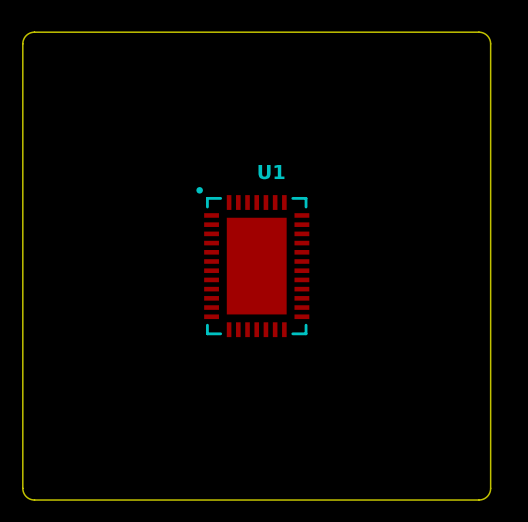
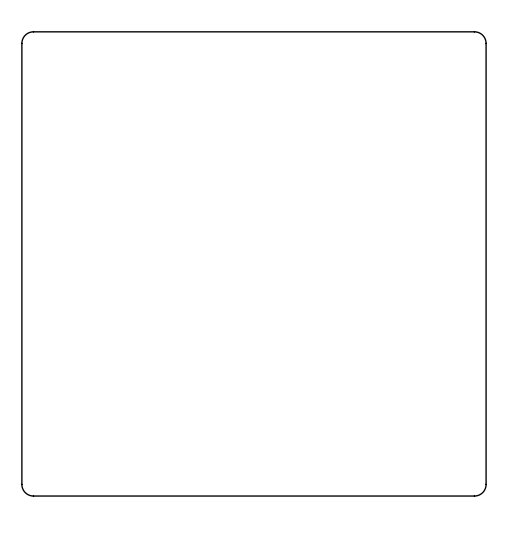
U1: (252, 262) -> none

